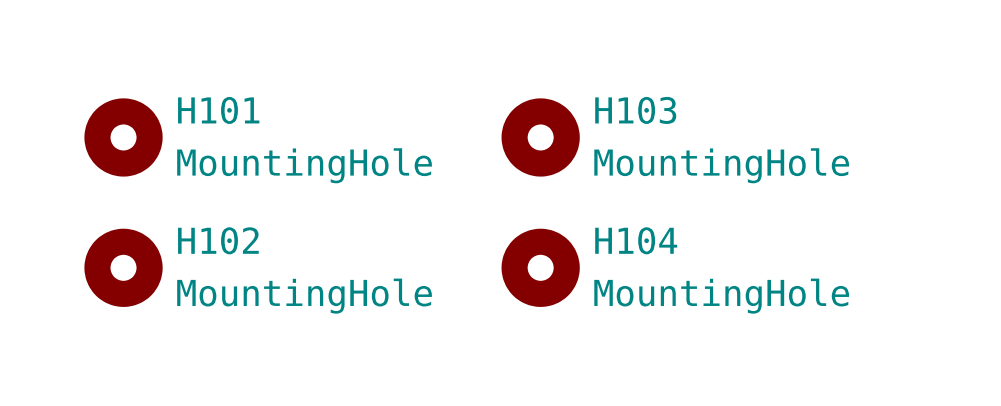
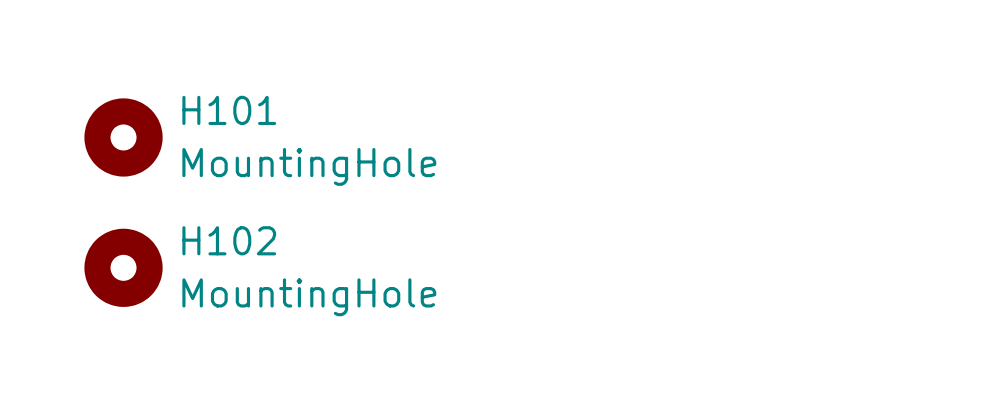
H103: MountingHole (540, 137) -> none
H104: MountingHole (540, 267) -> none

